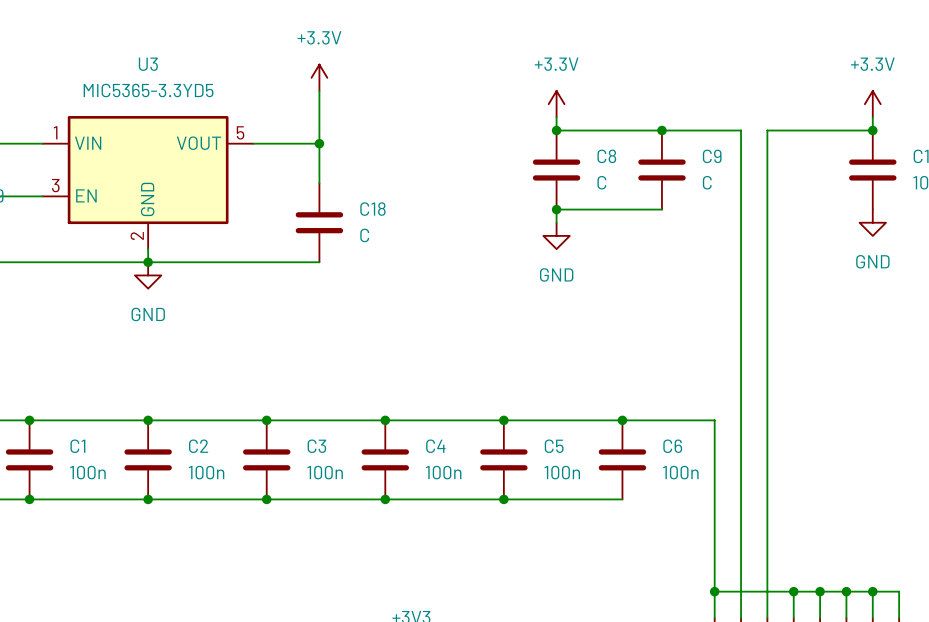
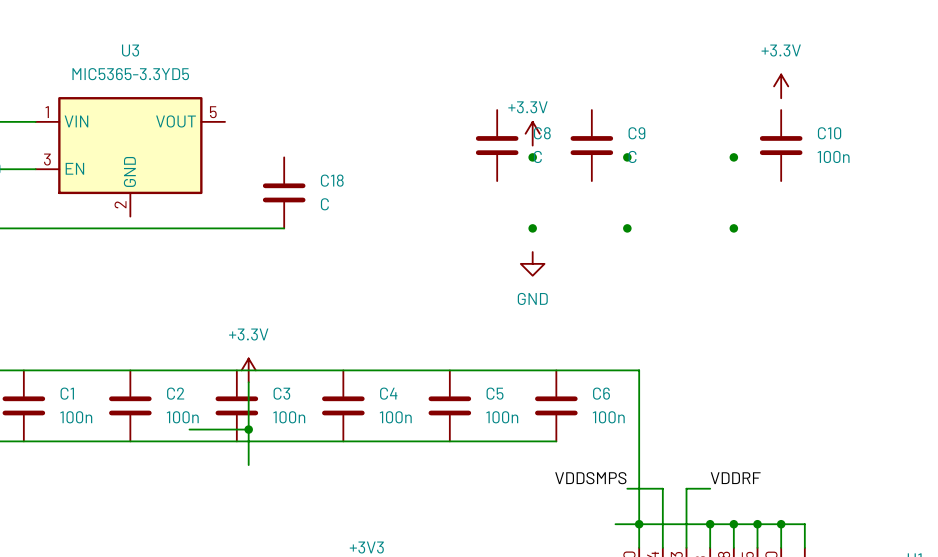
power symbol text position: +3.3V (556, 64) -> +3.3V (527, 107)
power symbol: +3.3V (319, 77) -> none
wire: (319, 90) (319, 183) -> none
power symbol position: +3.3V (556, 104) -> +3.3V (532, 133)
wire: (556, 117) (556, 130) (741, 130) (741, 552) -> (627, 488) (662, 488)
wire: (872, 117) (872, 130) (767, 130) (767, 552) -> (710, 488) (686, 488)
junction: (556, 130) -> none
junction: (661, 130) -> none
junction: (872, 130) -> none
wire: (253, 143) (319, 143) -> none
junction: (319, 143) -> none
junction: none -> (532, 157)
junction: none -> (627, 157)
junction: none -> (733, 157)
junction: (556, 209) -> none
wire: (661, 209) (556, 209) (556, 222) -> none
power symbol: GND (872, 222) -> none
power symbol position: GND (556, 235) -> GND (532, 263)
wire: (148, 249) (148, 262) -> none
junction: (148, 262) -> none
junction: none -> (532, 228)
junction: none -> (627, 228)
junction: none -> (733, 228)
power symbol: GND (148, 275) -> none
junction: (29, 420) -> none
junction: (148, 420) -> none
junction: (266, 420) -> none
power symbol: none -> +3.3V (248, 370)
junction: (385, 420) -> none
junction: (503, 420) -> none
junction: (622, 420) -> none
wire: none -> (248, 382) (248, 465)
wire: none -> (189, 429) (248, 429)
junction: (29, 499) -> none
junction: (148, 499) -> none
junction position: (266, 499) -> (248, 429)
junction: (385, 499) -> none
junction: (503, 499) -> none
label: none -> VDDSMPS (590, 478)
label: none -> VDDRF (735, 478)
wire: none -> (615, 524) (639, 524)

